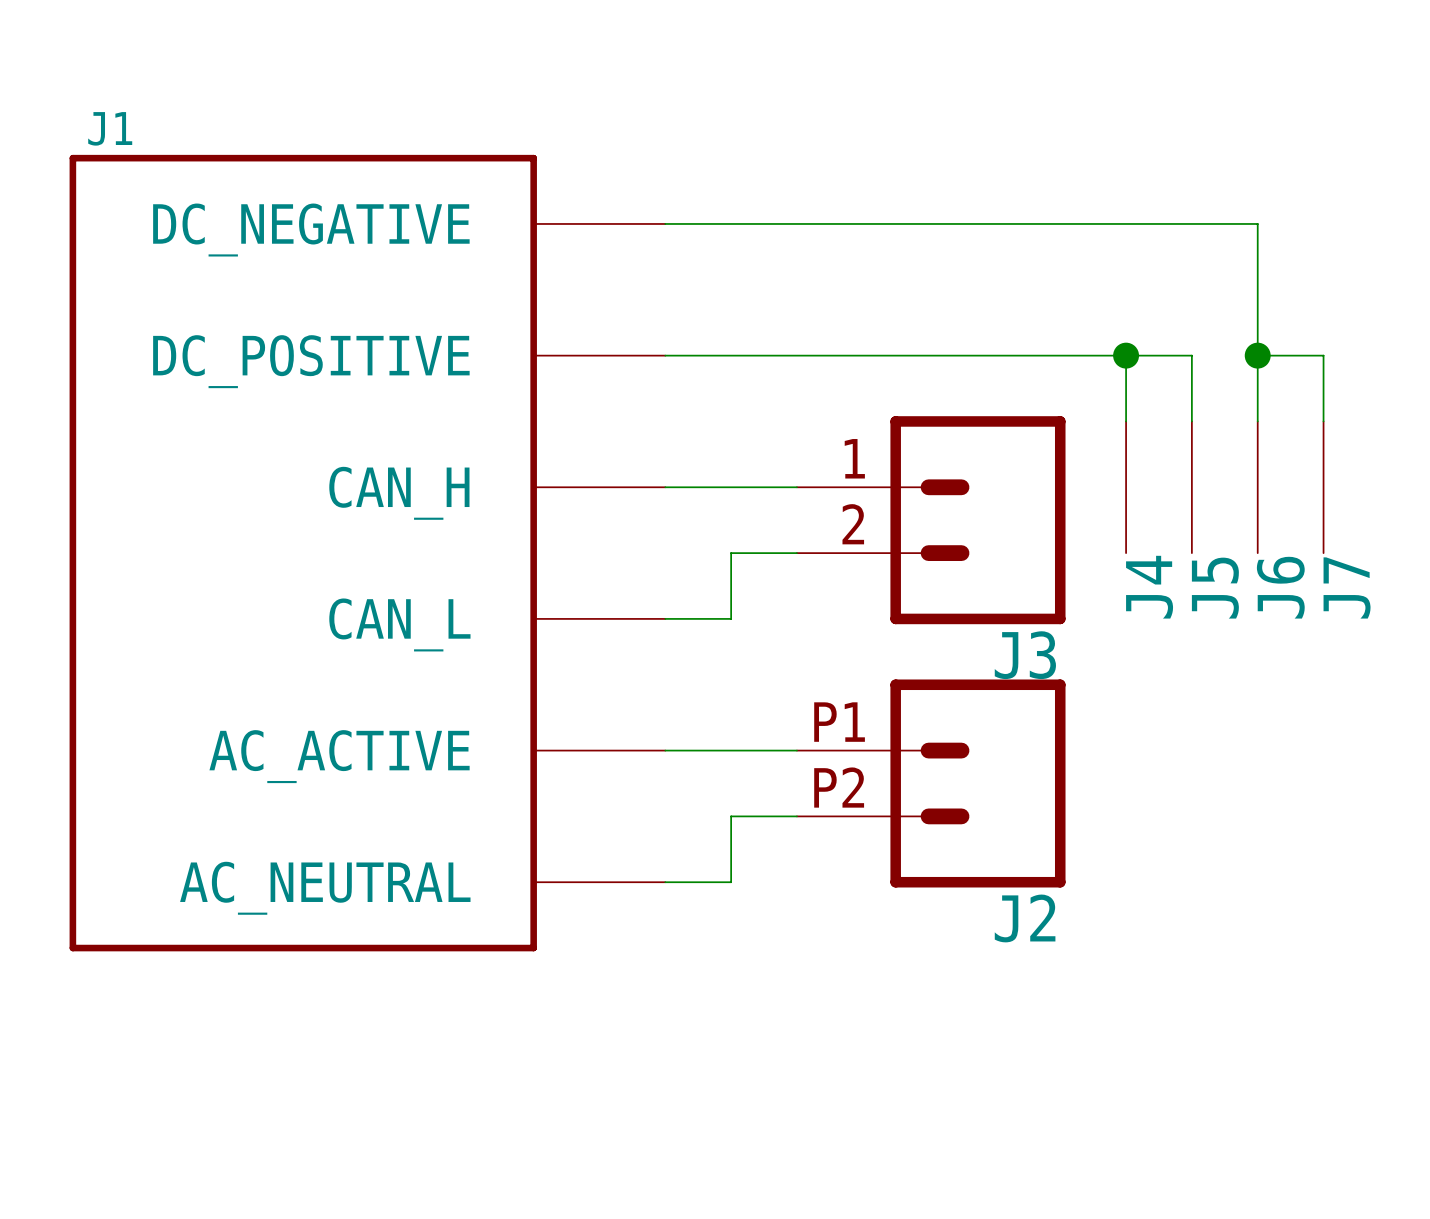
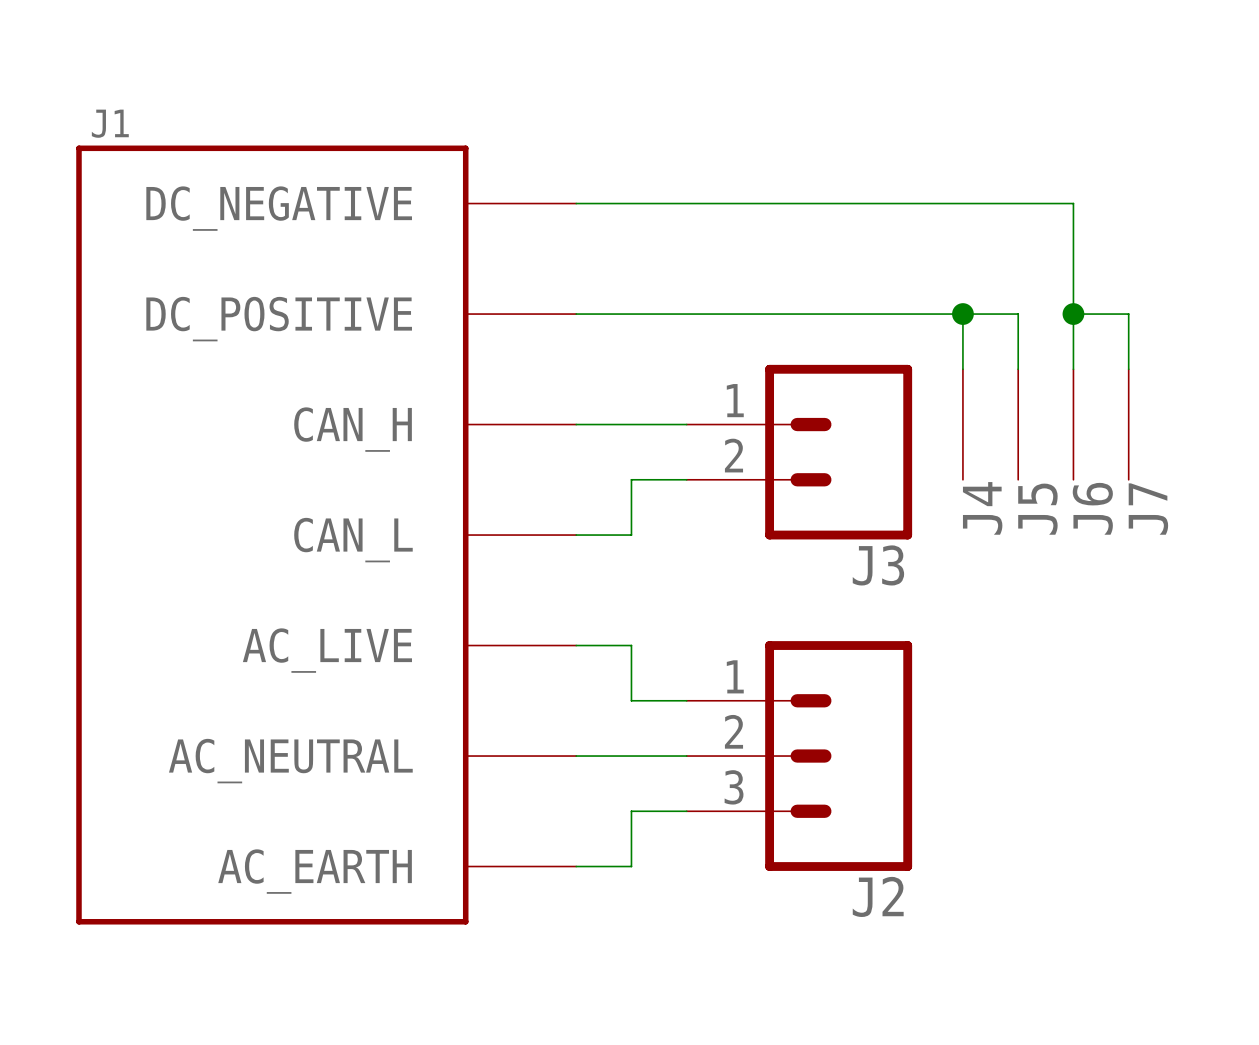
J1 symbol: [69, 154, 666, 952] -> [76, 145, 577, 925]
J2 symbol: [796, 679, 1066, 888] -> [686, 641, 913, 871]
wire: (731, 750) (796, 750) -> (631, 645) (631, 700)
wire: (731, 816) (731, 882) -> (686, 756) (631, 756)
wire: none -> (686, 811) (631, 811) (631, 866) (576, 866)

